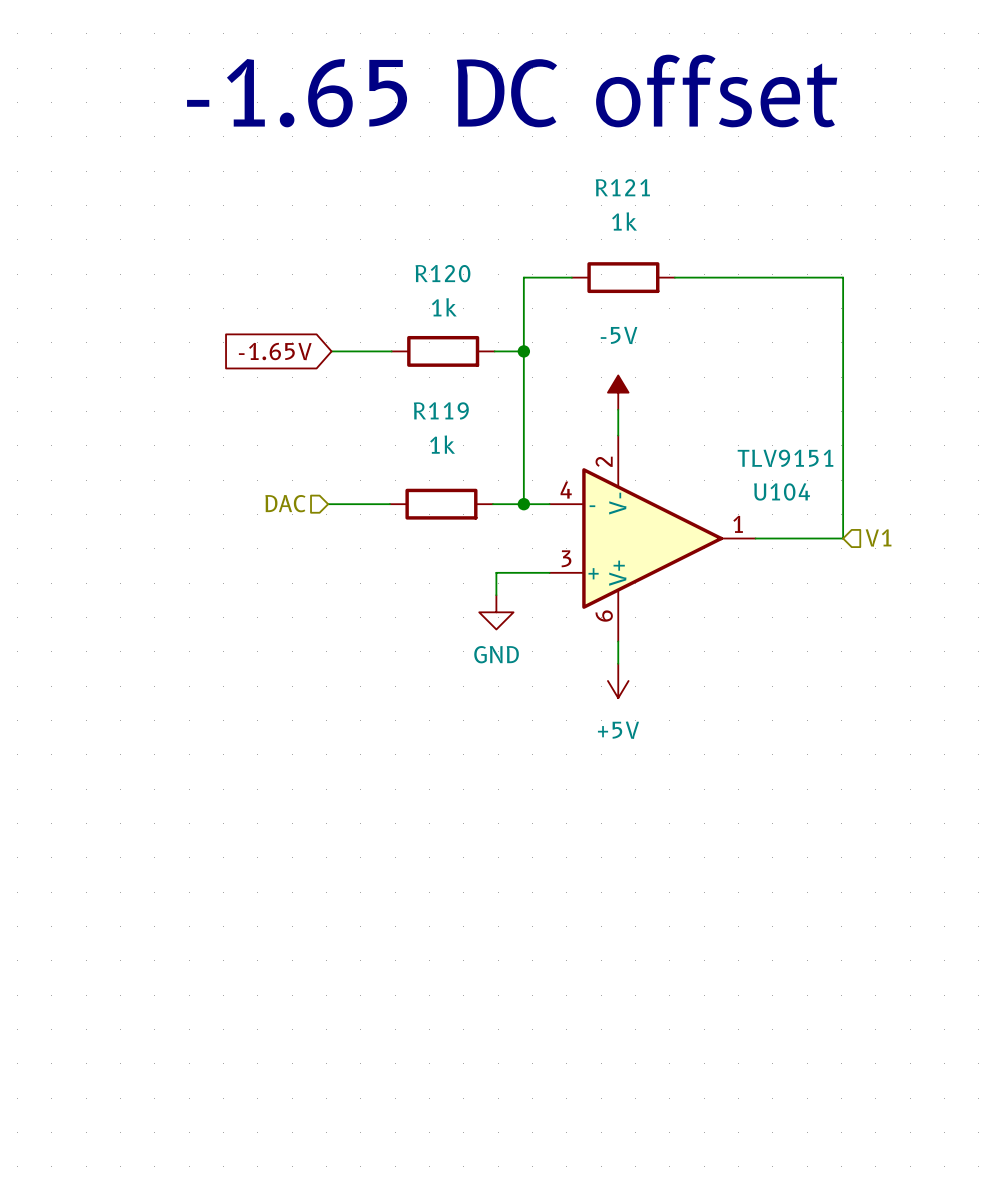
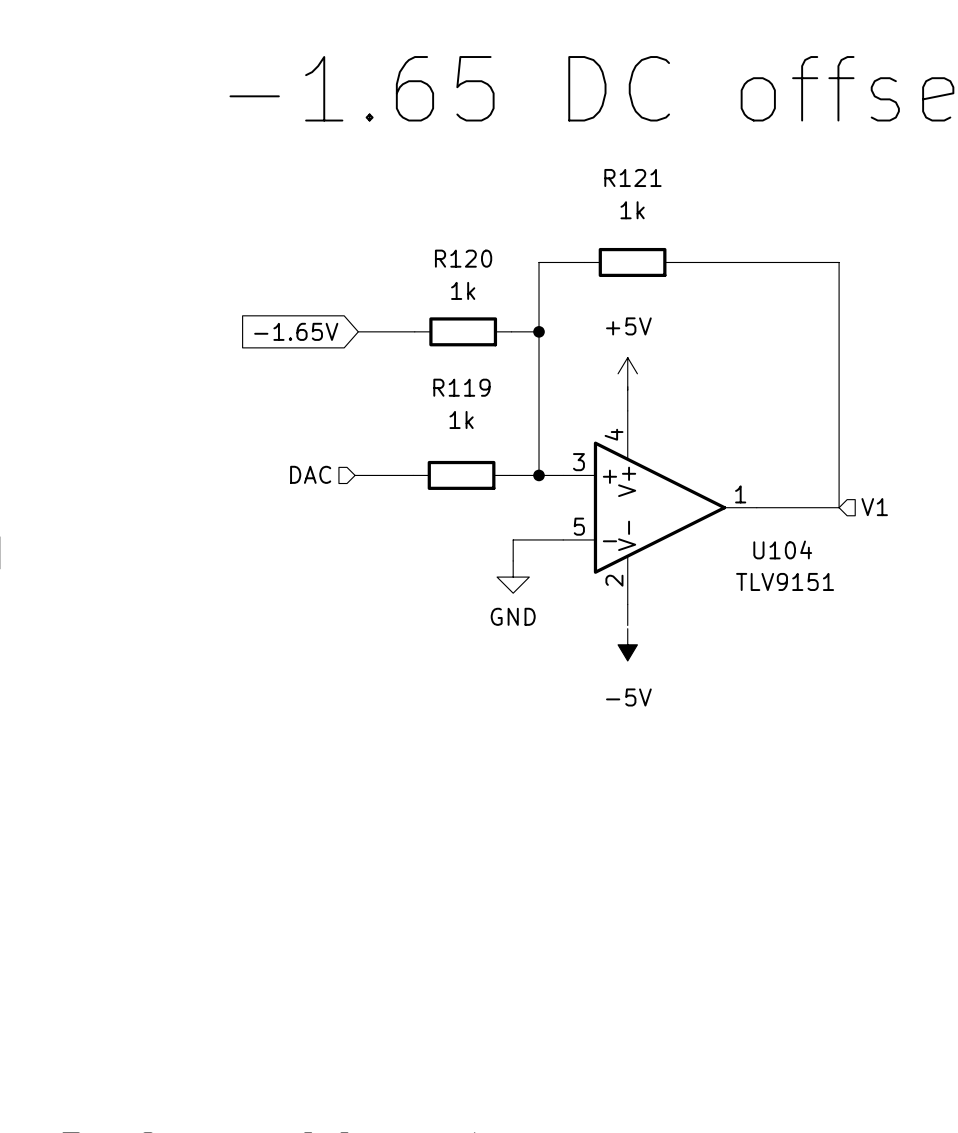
power symbol: -5V (618, 392) -> +5V (627, 373)
U104 value position: TLV9151 (785, 458) -> TLV9151 (785, 581)
U104 pin number: 2 (604, 461) -> 4 (614, 434)
U104 pin number: 4 (566, 490) -> 3 (578, 462)
U104 name position: U104 (782, 491) -> U104 (782, 549)
U104 pin name: V- (617, 503) -> V+ (627, 481)
U104 pin name: - (592, 506) -> + (609, 476)
U104 pin number: 3 (566, 558) -> 5 (579, 526)
U104 pin name: + (593, 573) -> - (609, 541)
U104 pin name: V+ (617, 573) -> V- (627, 535)
U104 pin number: 6 (604, 616) -> 2 (614, 580)
power symbol: +5V (618, 680) -> -5V (627, 644)

